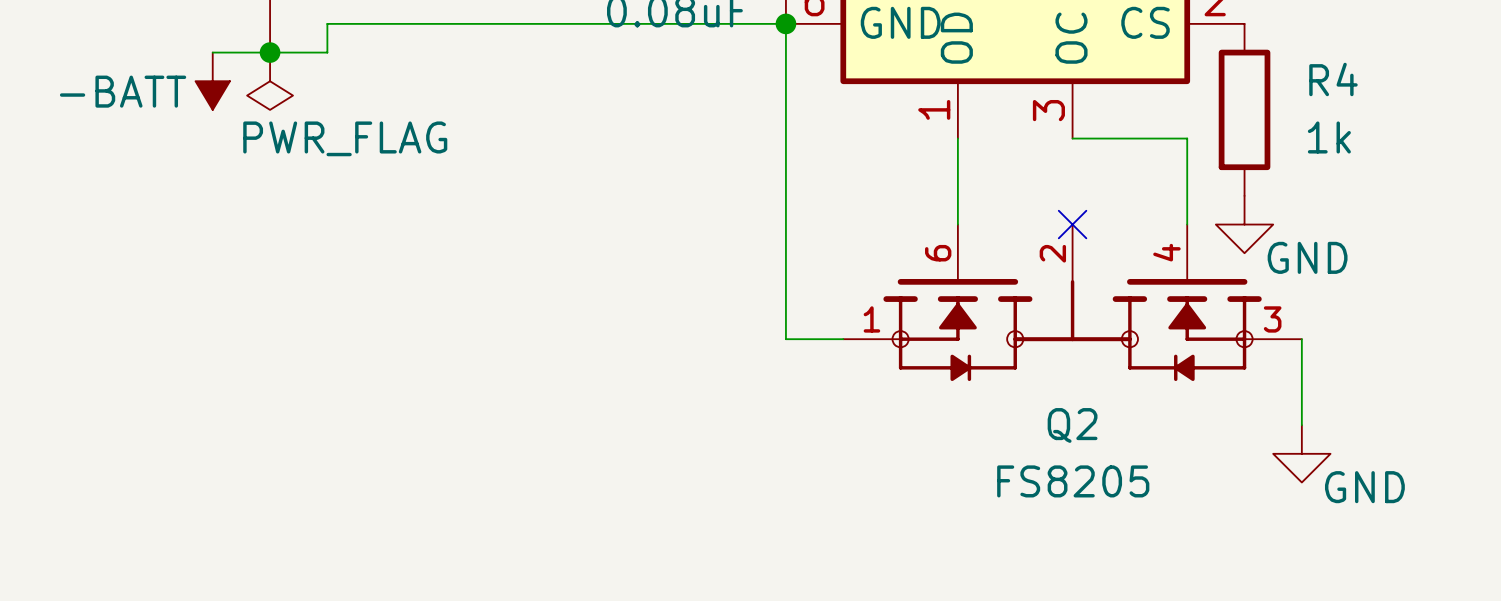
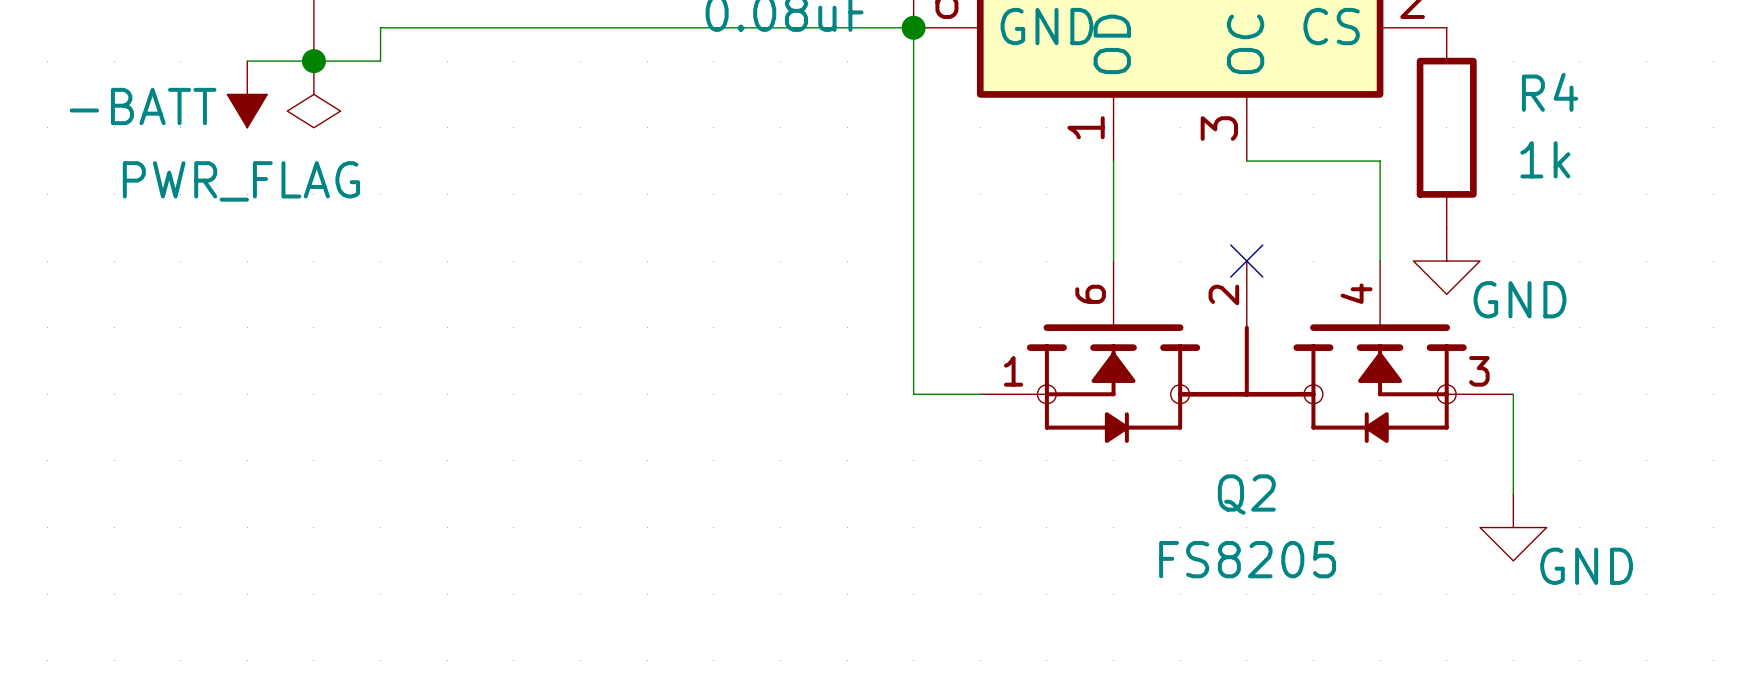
power symbol text position: PWR_FLAG (345, 138) -> PWR_FLAG (241, 181)

